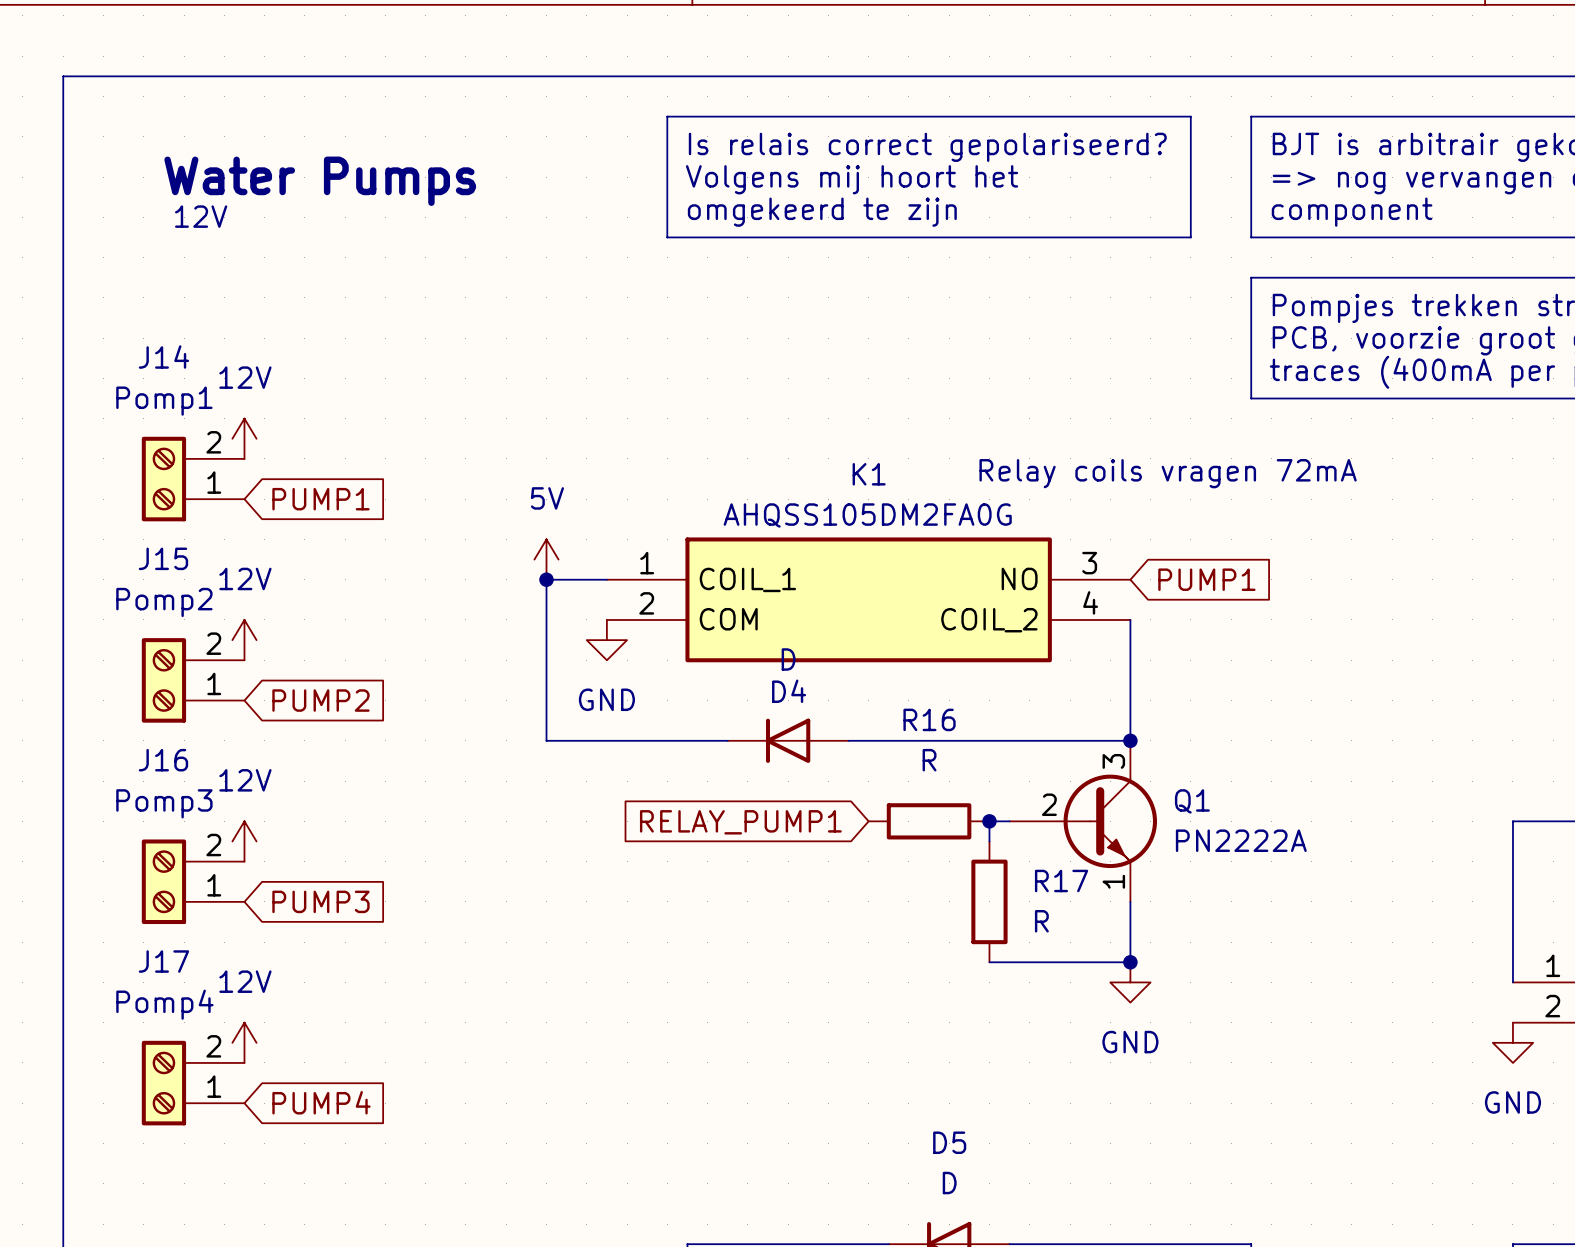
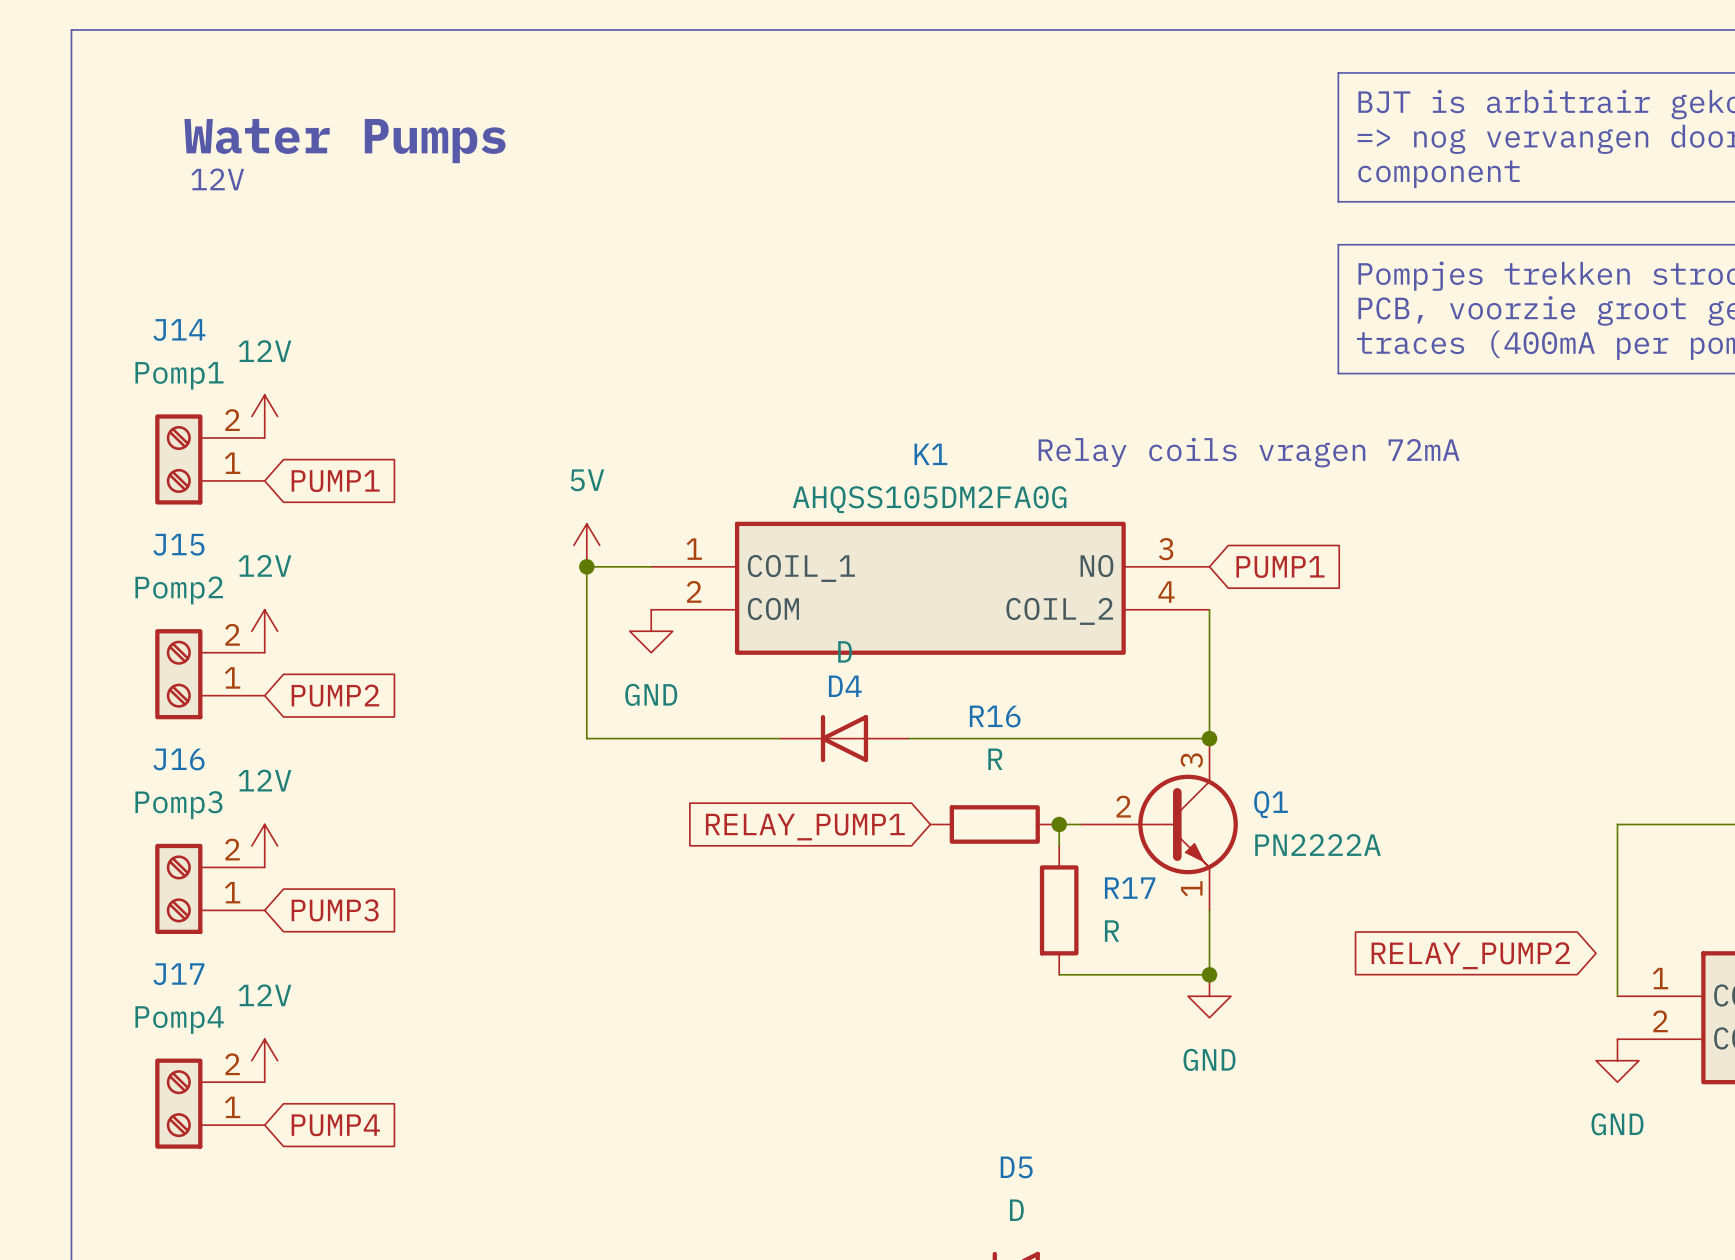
line: (667, 116) (1190, 116) (1190, 237) (667, 237) (667, 116) -> none
text: Is relais correct gepolariseerd? (927, 147) -> none
text: Volgens mij hoort het (852, 179) -> none
text: omgekeerd te zijn (822, 212) -> none
global label: none -> RELAY_PUMP2 (1470, 955)

